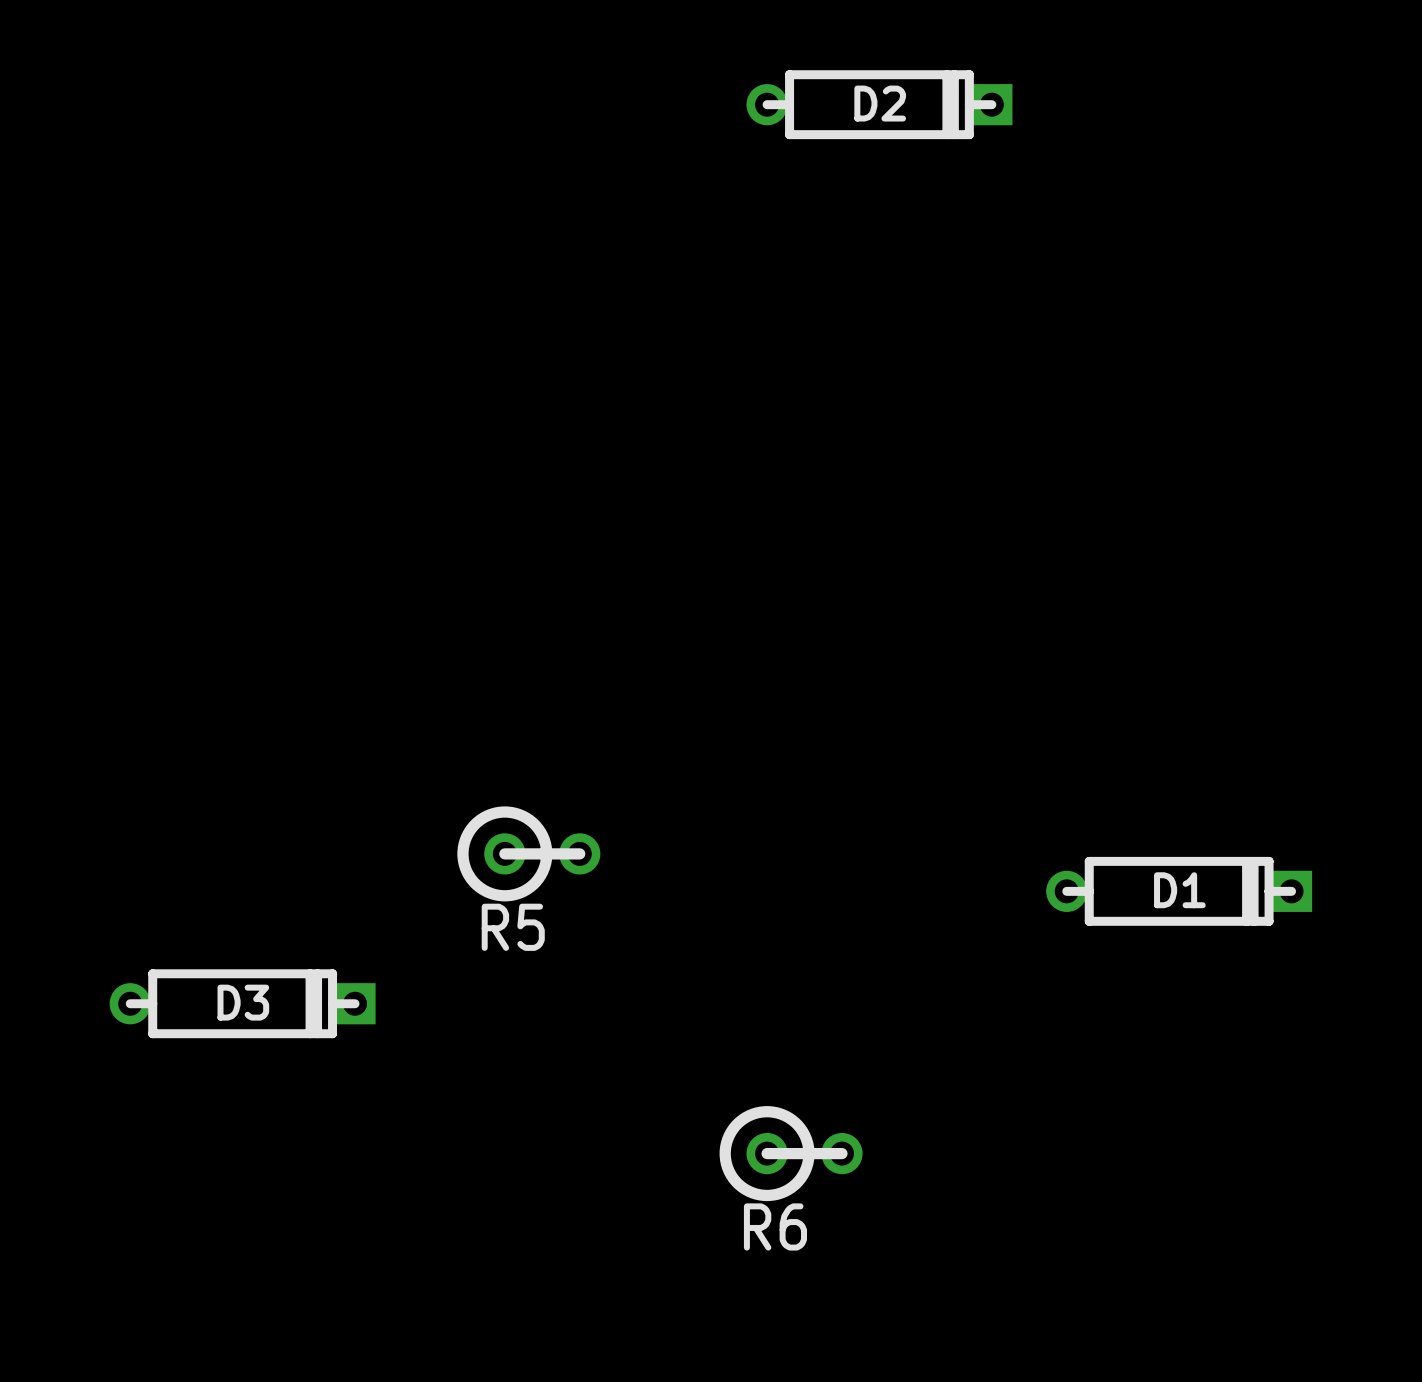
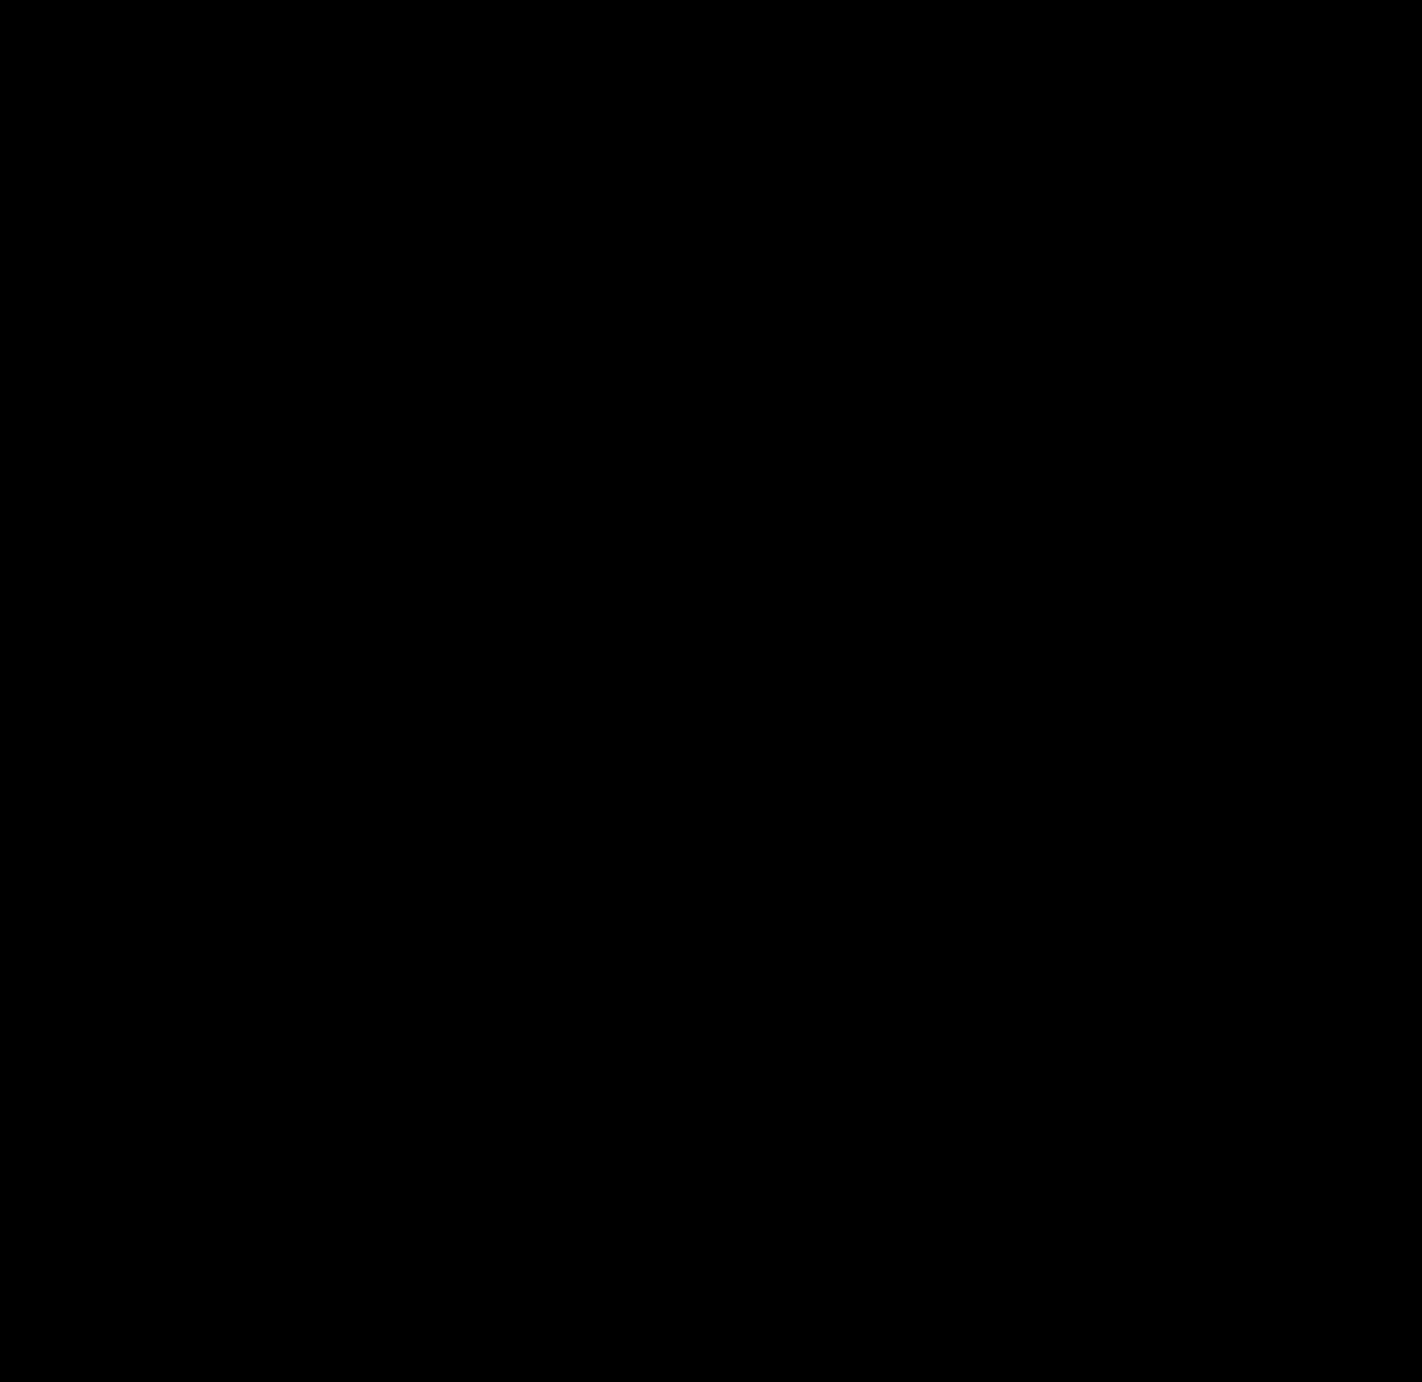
D2: (879, 104) -> none
R5: (528, 853) -> none
D1: (1179, 891) -> none
D3: (242, 1003) -> none
R6: (791, 1153) -> none

